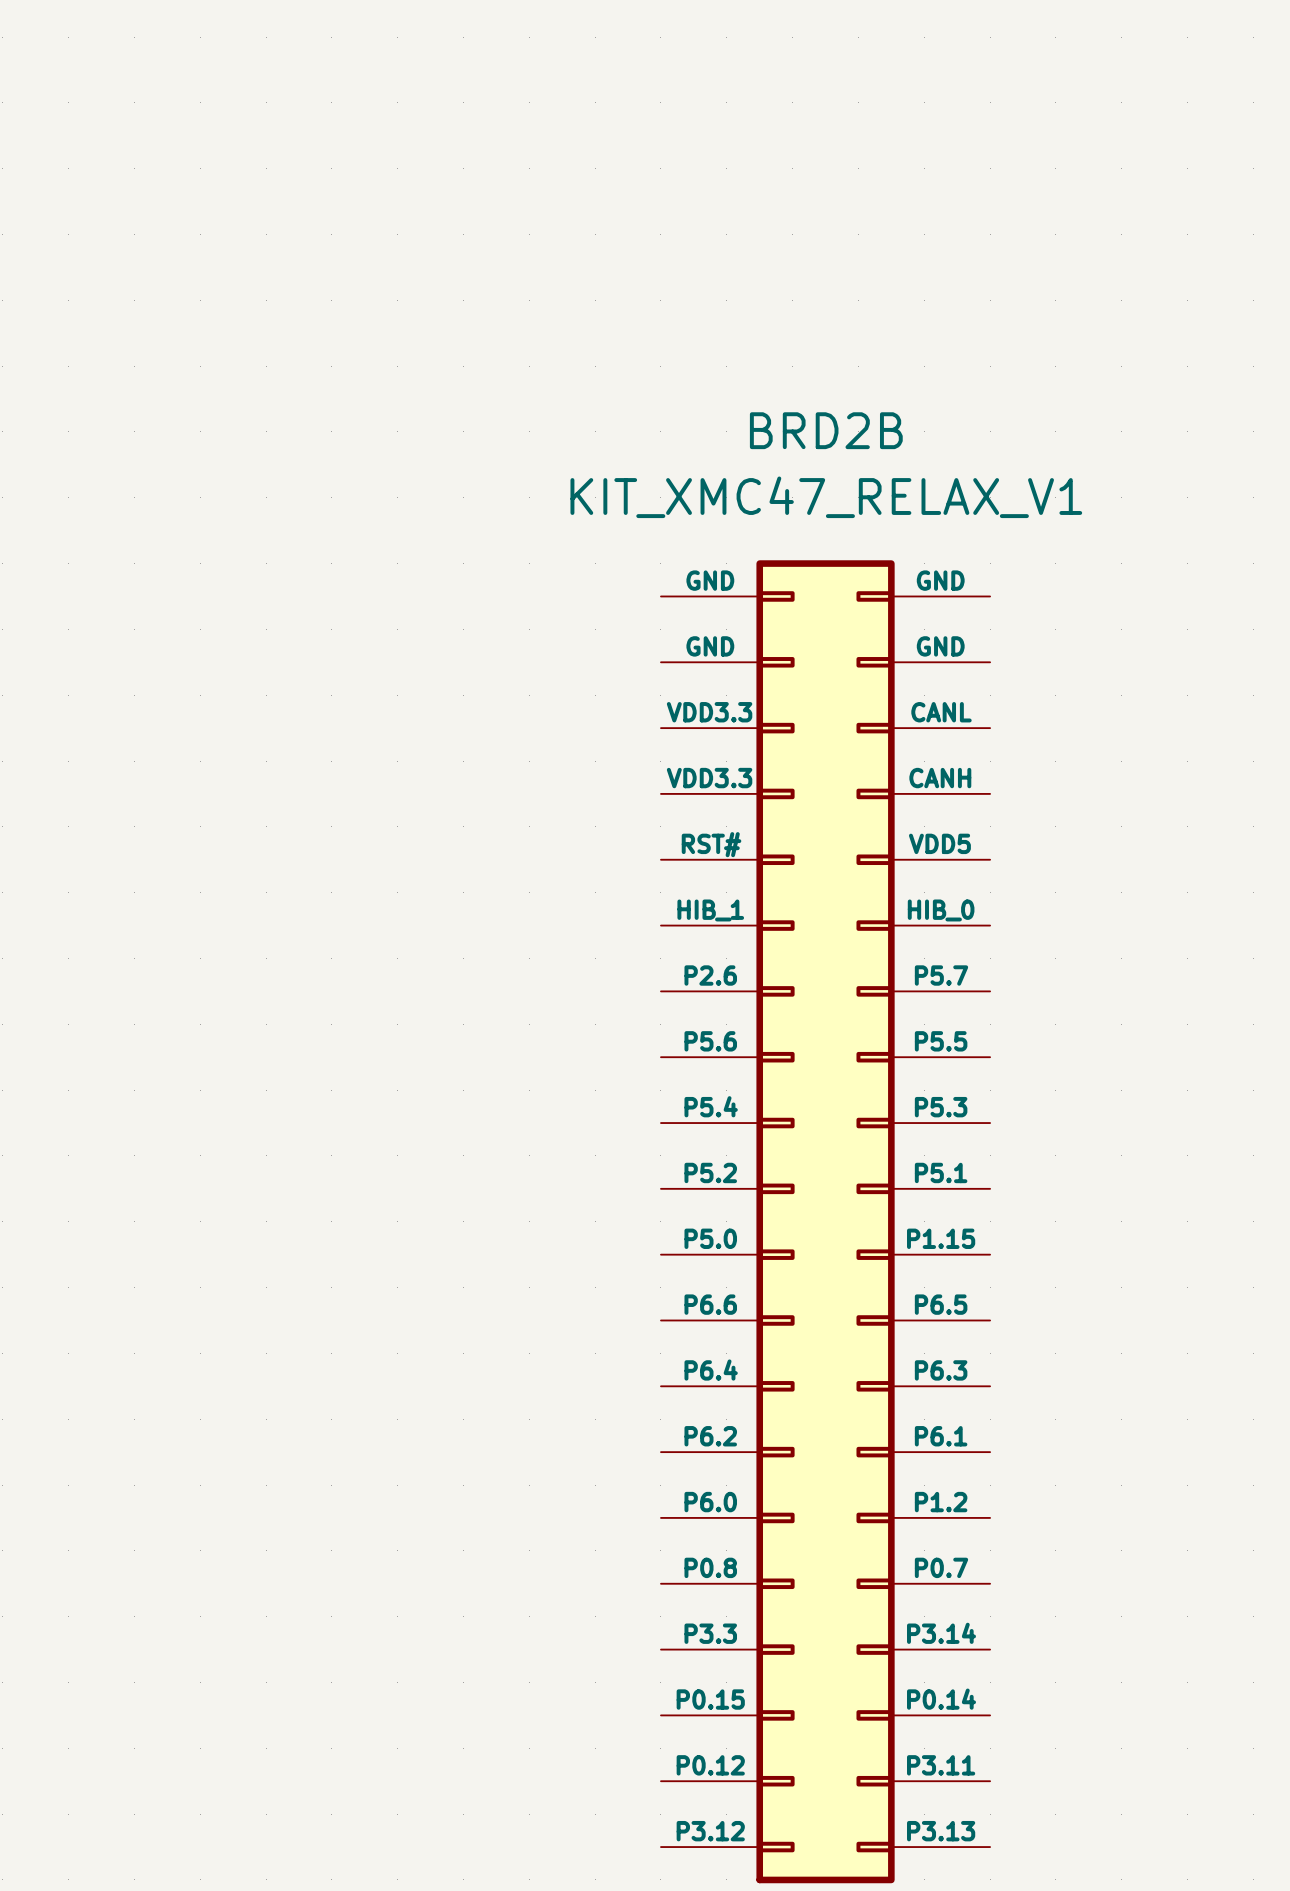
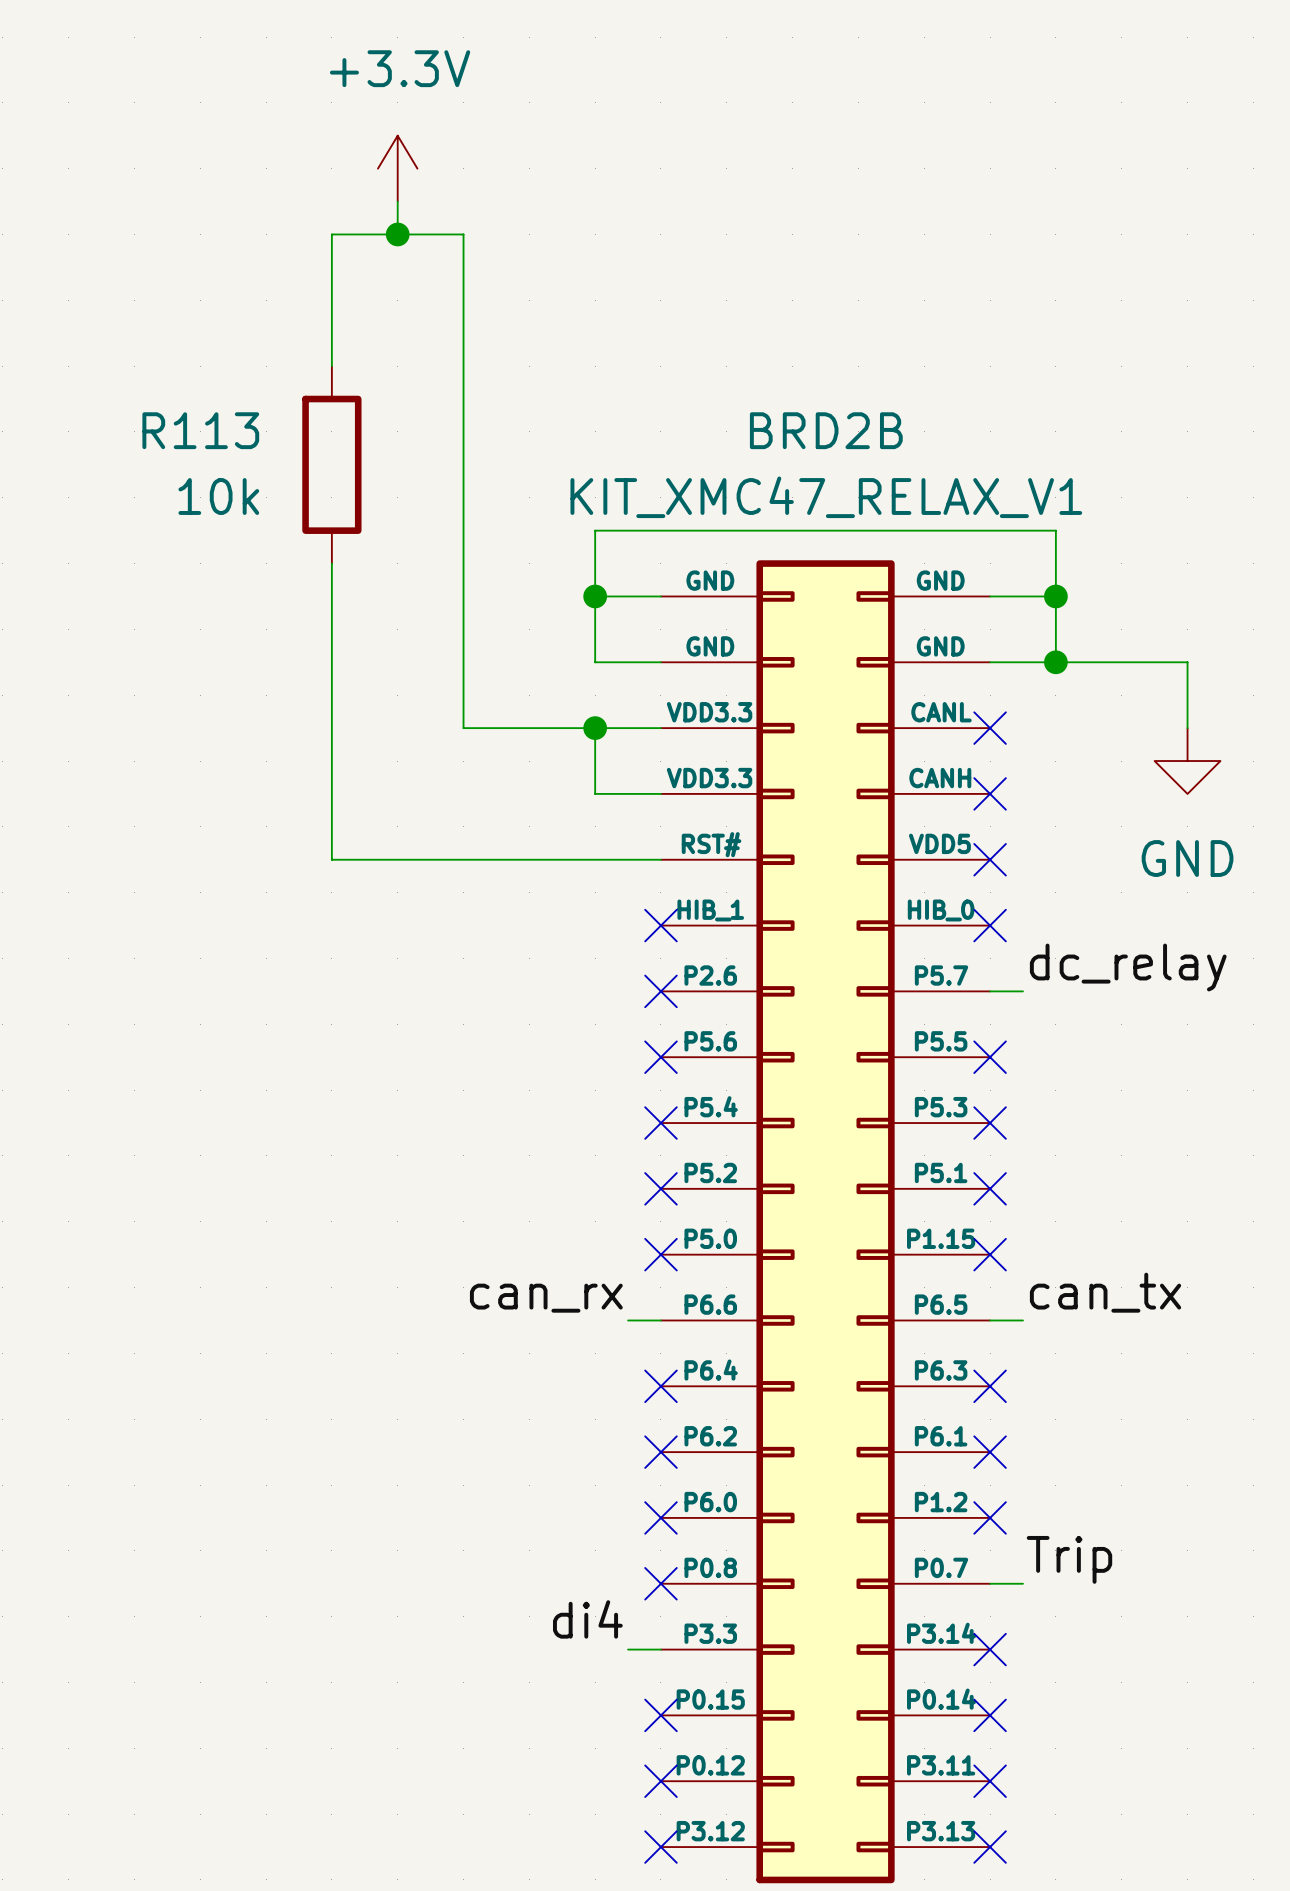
power symbol: none -> +3.3V (397, 168)
wire: none -> (397, 201) (397, 234)
junction: none -> (397, 234)
wire: none -> (331, 366) (331, 234) (463, 234) (463, 728) (660, 728)
R113: none -> 10k (331, 464)
wire: none -> (331, 563) (331, 859) (660, 859)
wire: none -> (595, 596) (660, 596)
junction: none -> (595, 596)
wire: none -> (990, 596) (1055, 596)
junction: none -> (1055, 596)
wire: none -> (660, 662) (595, 662) (595, 530) (1055, 530) (1055, 662)
wire: none -> (990, 662) (1187, 662) (1187, 728)
junction: none -> (1055, 662)
wire: none -> (595, 728) (595, 793) (660, 793)
junction: none -> (595, 728)
no-connect mark: none -> (990, 728)
power symbol: none -> GND (1187, 761)
no-connect mark: none -> (990, 793)
no-connect mark: none -> (990, 859)
no-connect mark: none -> (660, 925)
no-connect mark: none -> (990, 925)
label: none -> dc_relay (1128, 967)
no-connect mark: none -> (660, 991)
wire: none -> (990, 991) (1022, 991)
no-connect mark: none -> (660, 1057)
no-connect mark: none -> (990, 1057)
no-connect mark: none -> (660, 1123)
no-connect mark: none -> (990, 1123)
no-connect mark: none -> (660, 1188)
no-connect mark: none -> (990, 1188)
no-connect mark: none -> (660, 1254)
no-connect mark: none -> (990, 1254)
label: none -> can_tx (1105, 1292)
label: none -> can_rx (546, 1298)
wire: none -> (628, 1320) (660, 1320)
wire: none -> (990, 1320) (1022, 1320)
no-connect mark: none -> (660, 1386)
no-connect mark: none -> (990, 1386)
no-connect mark: none -> (660, 1452)
no-connect mark: none -> (990, 1452)
no-connect mark: none -> (660, 1517)
no-connect mark: none -> (990, 1517)
label: none -> Trip (1069, 1559)
no-connect mark: none -> (660, 1583)
wire: none -> (990, 1583) (1022, 1583)
label: none -> di4 (587, 1619)
wire: none -> (628, 1649) (660, 1649)
no-connect mark: none -> (990, 1649)
no-connect mark: none -> (660, 1715)
no-connect mark: none -> (990, 1715)
no-connect mark: none -> (660, 1781)
no-connect mark: none -> (990, 1781)
no-connect mark: none -> (660, 1847)
no-connect mark: none -> (990, 1847)

